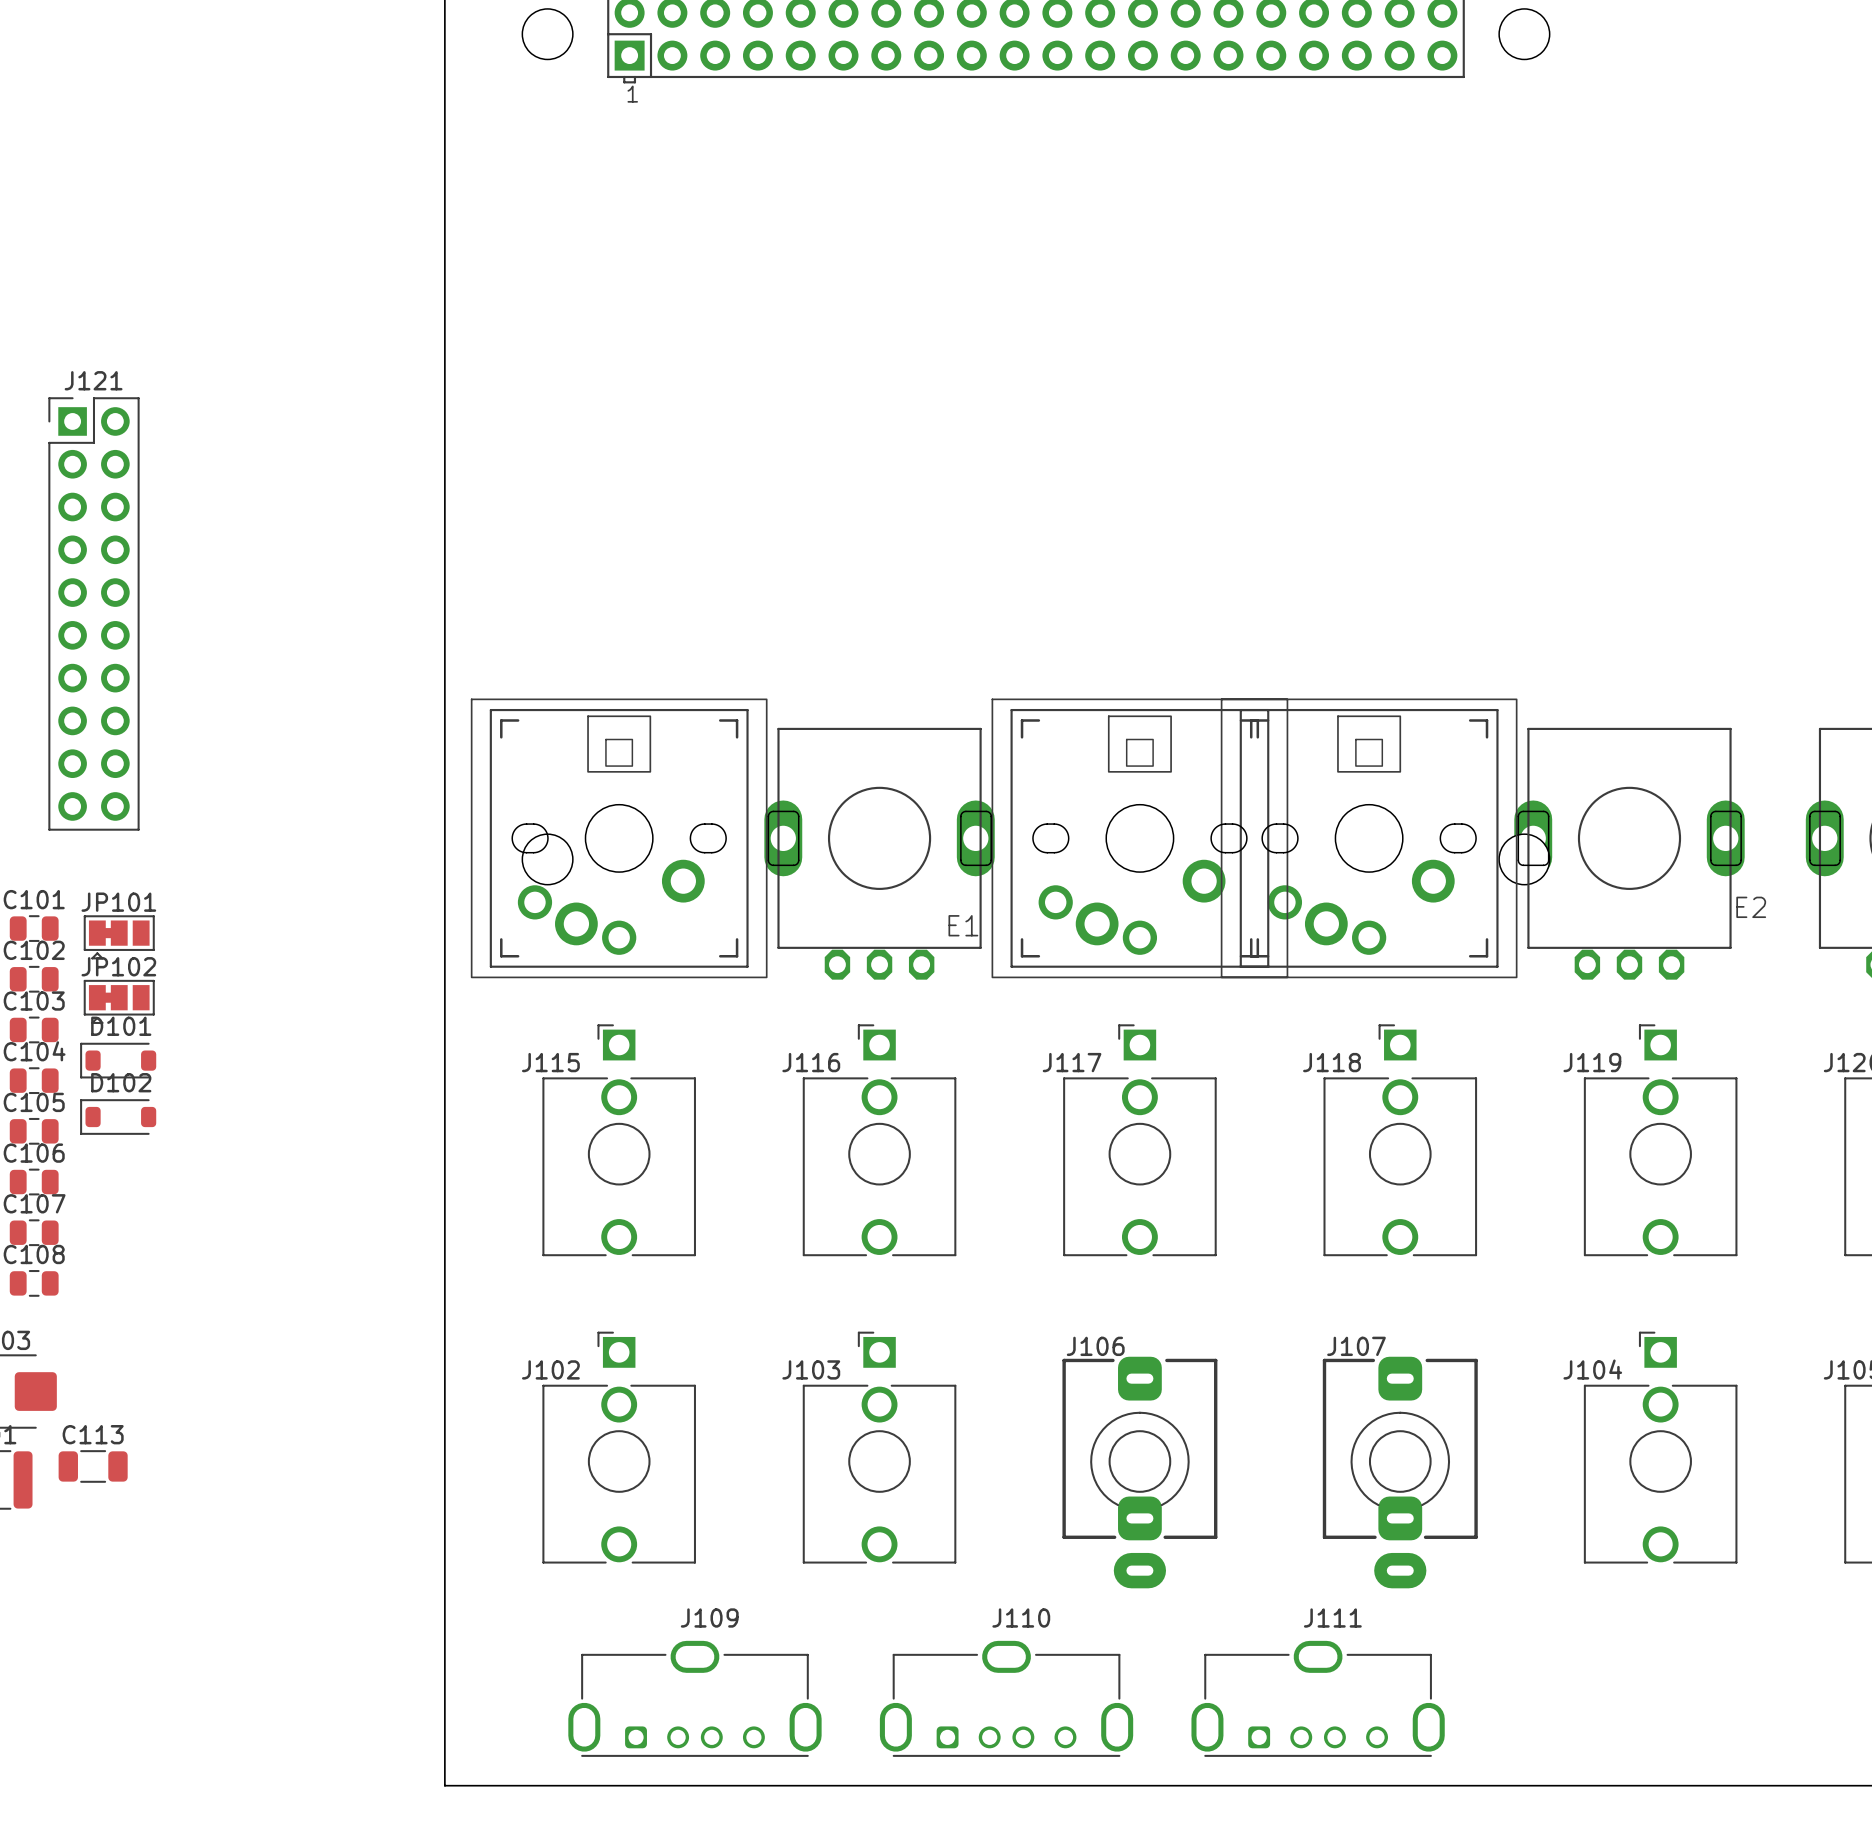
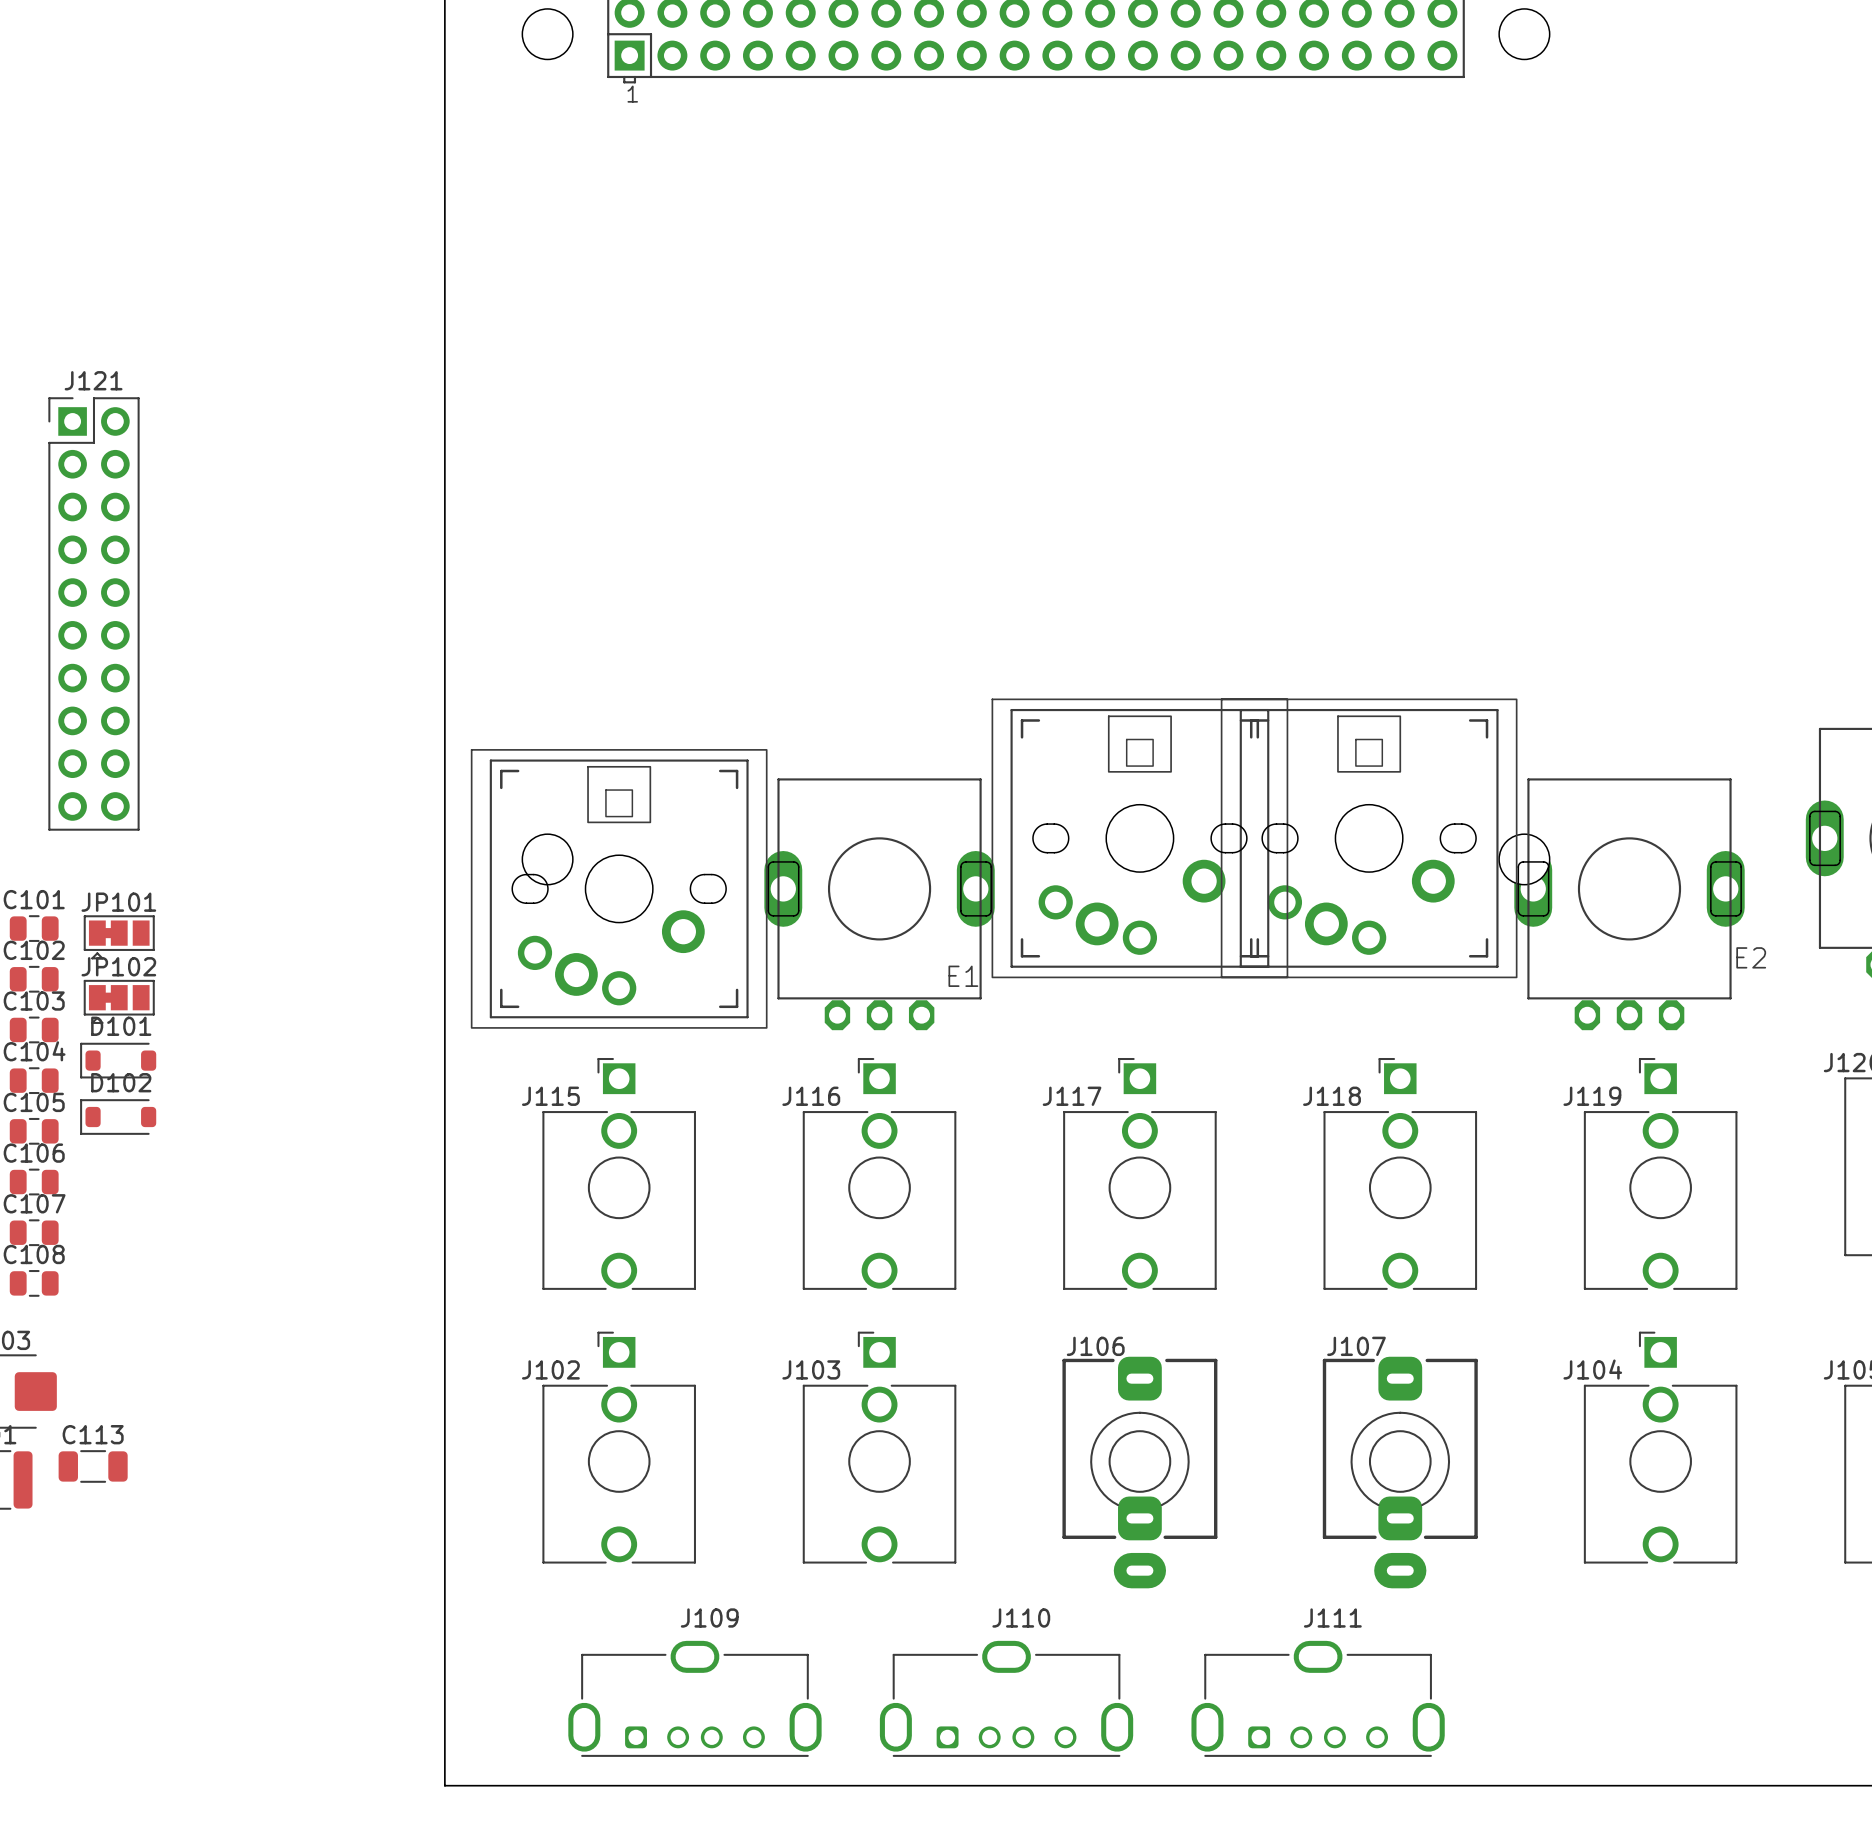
part position: (619, 838) -> (619, 888)
E1 position: (879, 853) -> (879, 904)
E2 position: (1629, 853) -> (1629, 904)
J115 position: (619, 1140) -> (619, 1173)
J116 position: (879, 1140) -> (879, 1173)
J117 position: (1139, 1140) -> (1139, 1173)
J118 position: (1400, 1140) -> (1400, 1173)
J119 position: (1660, 1140) -> (1660, 1173)

